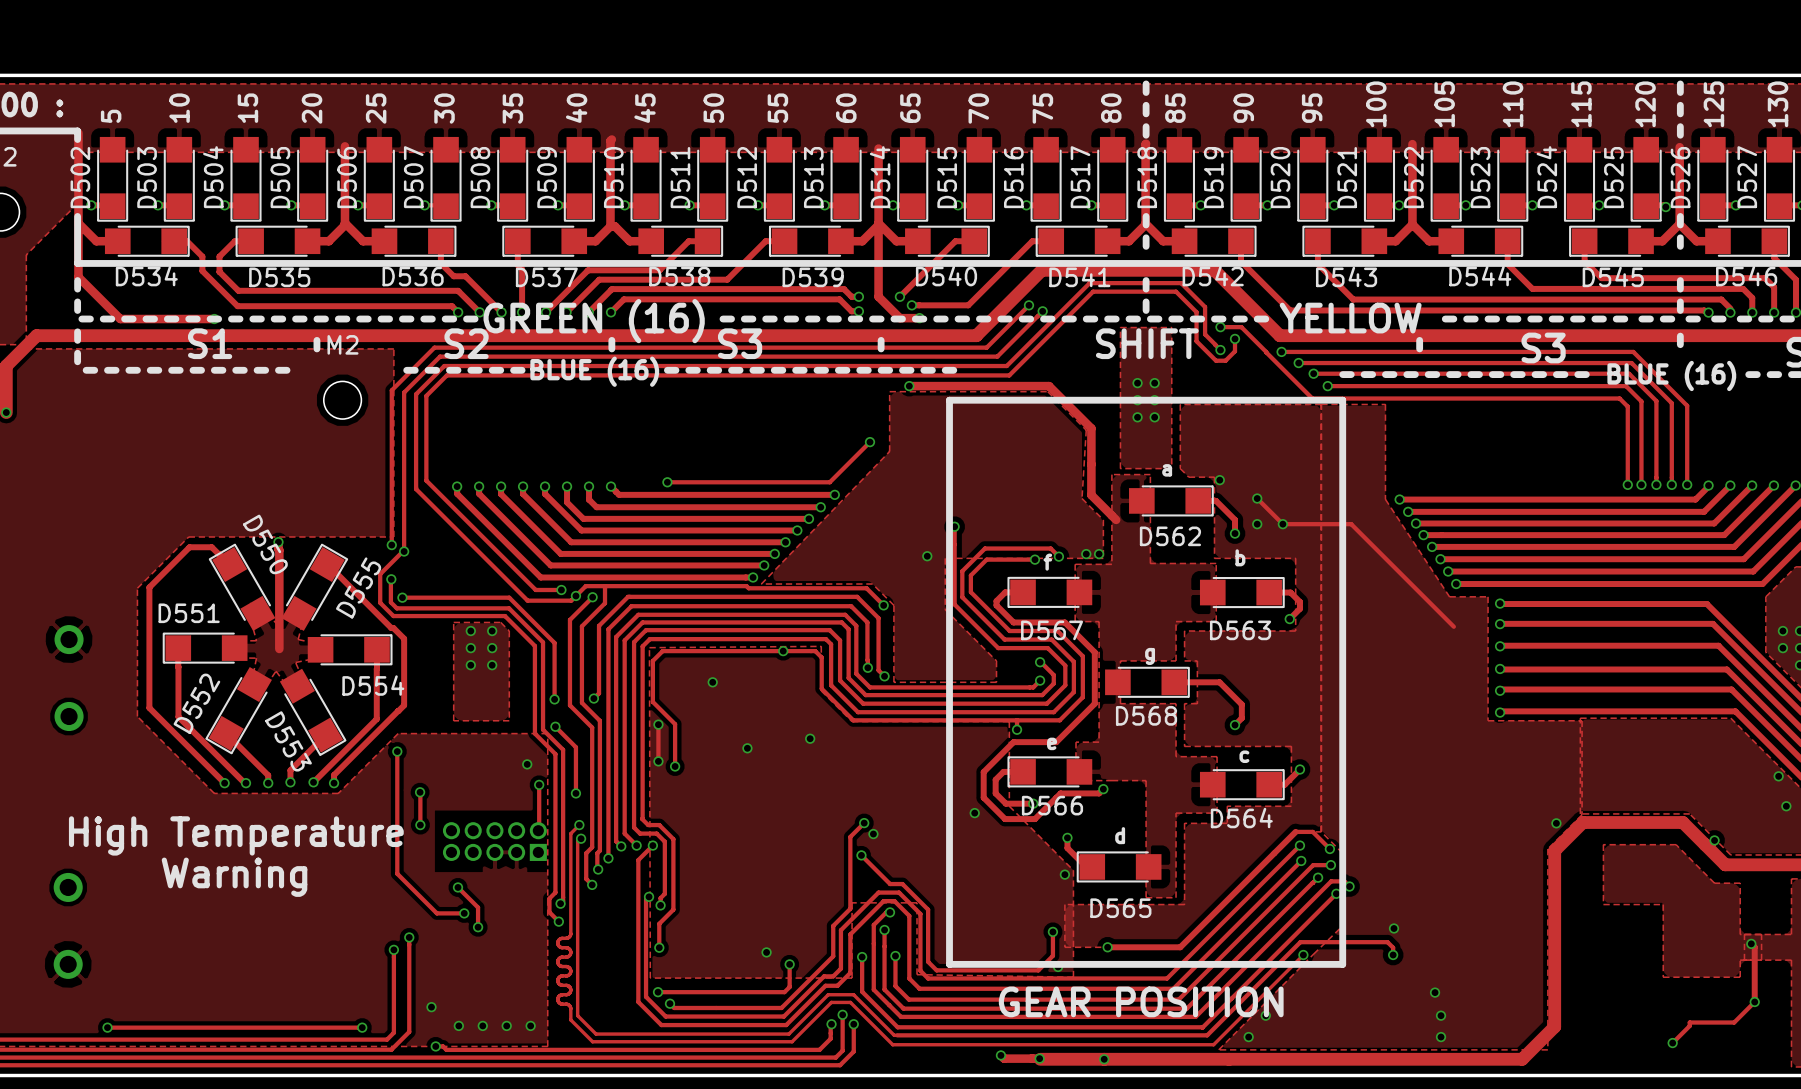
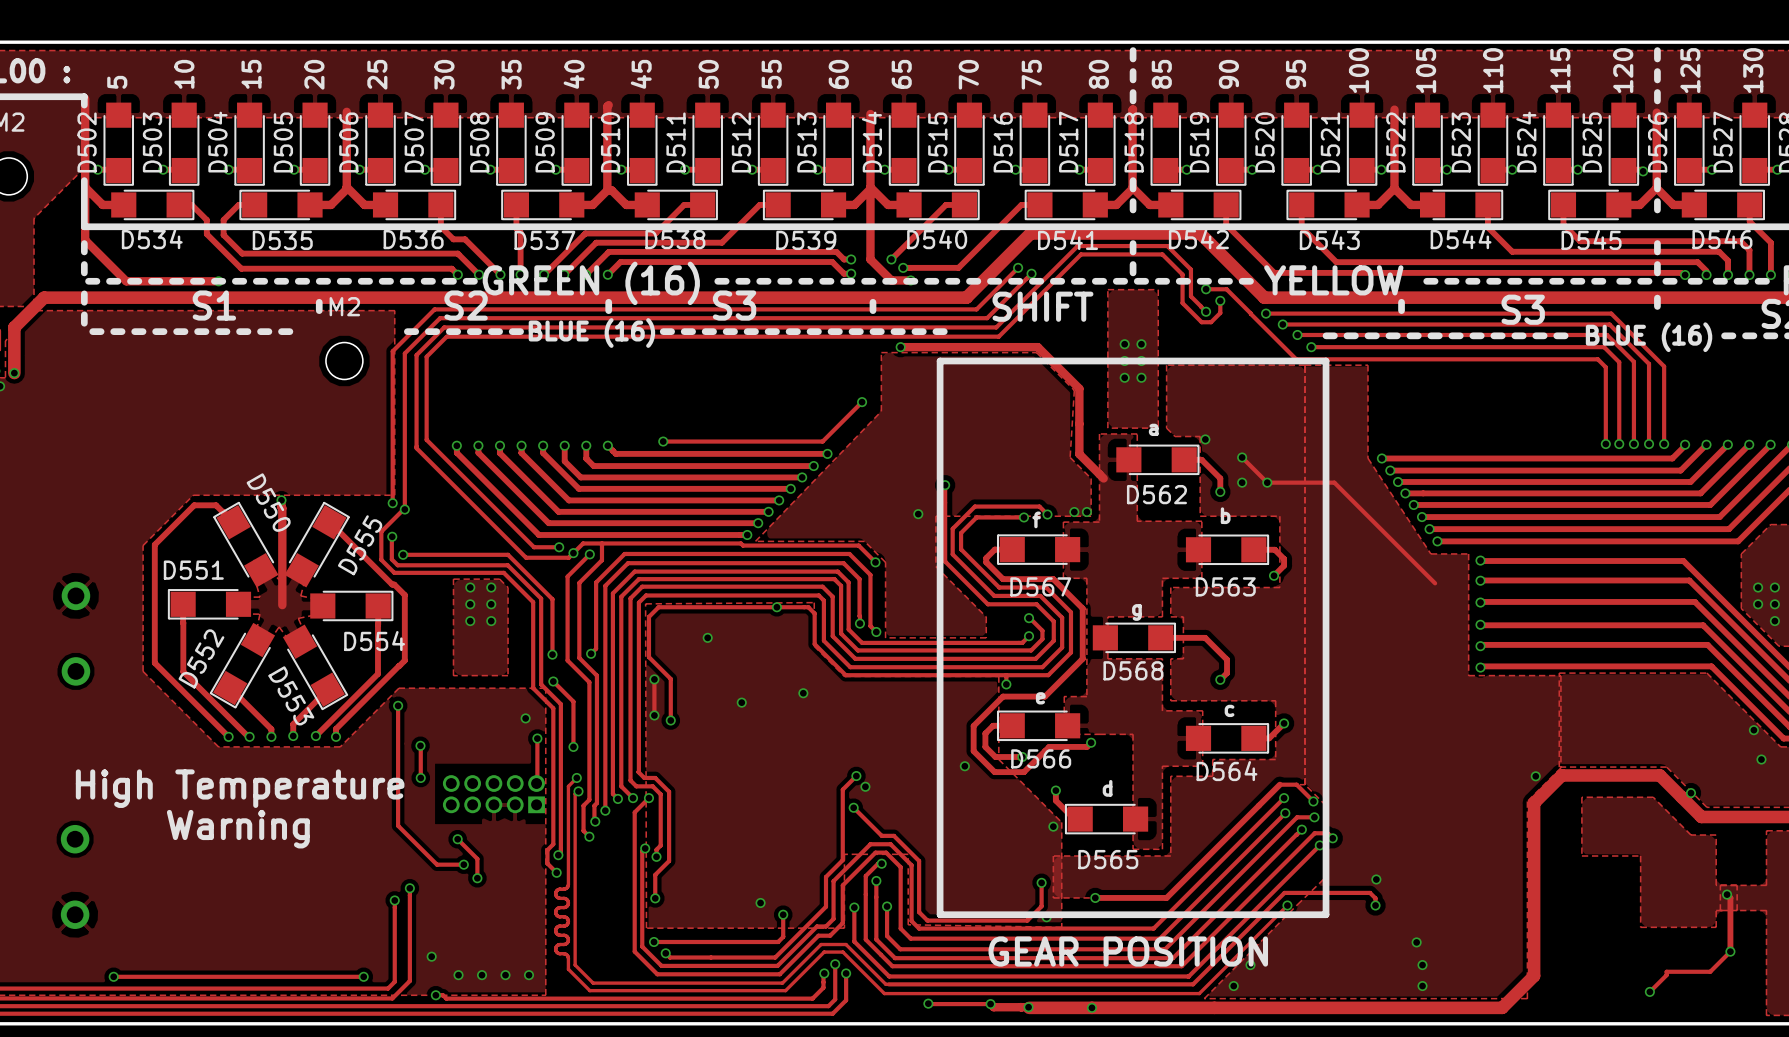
text position: SHIFT (1147, 343) -> SHIFT (1042, 306)
track: none -> (928, 1003) (990, 1004)
via: none -> (928, 1003)

